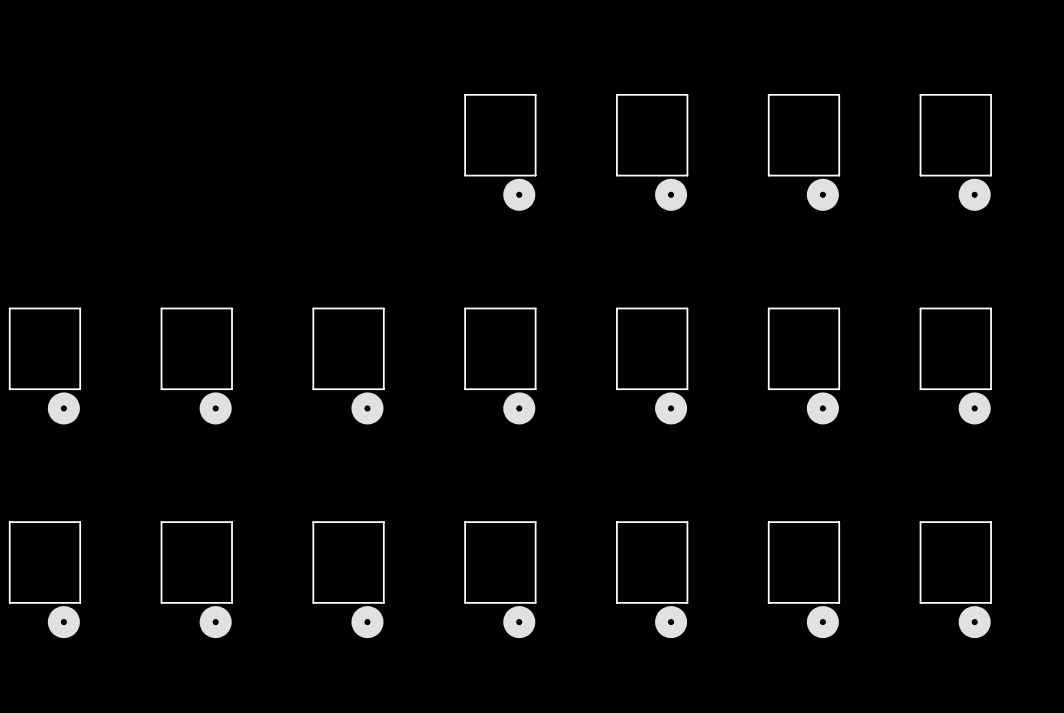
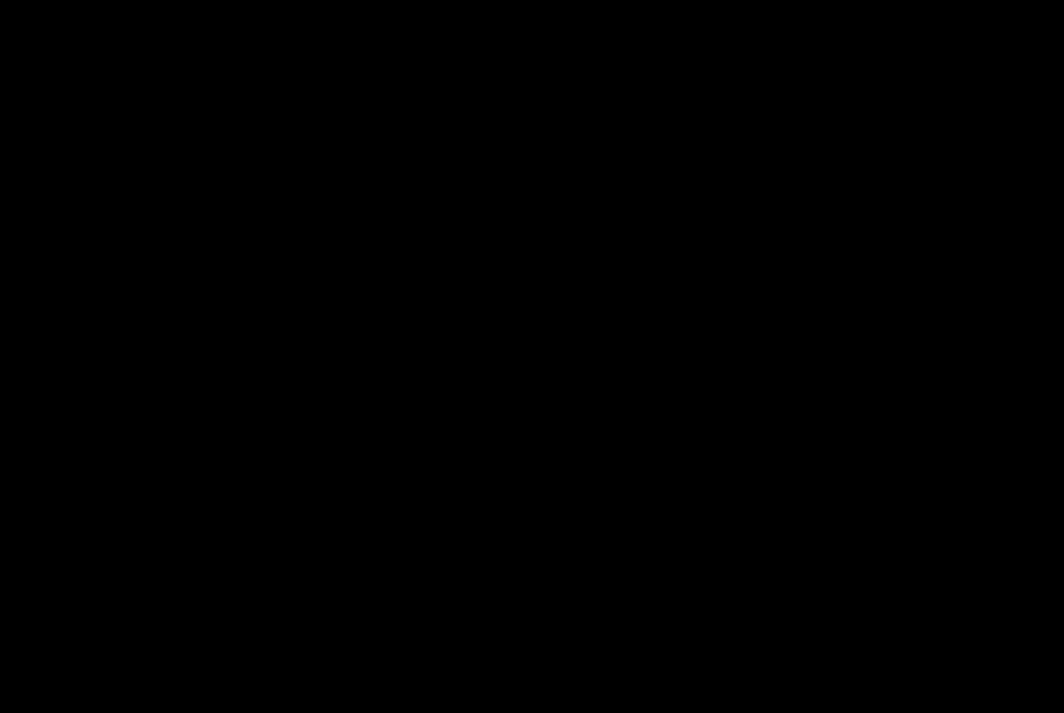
part: (500, 152) -> none
part: (652, 152) -> none
part: (803, 152) -> none
part: (955, 152) -> none
part: (44, 366) -> none
part: (196, 366) -> none
part: (348, 366) -> none
part: (500, 366) -> none
part: (652, 366) -> none
part: (803, 366) -> none
part: (955, 366) -> none
part: (44, 579) -> none
part: (196, 579) -> none
part: (348, 579) -> none
part: (500, 579) -> none
part: (652, 579) -> none
part: (803, 579) -> none
part: (955, 579) -> none

